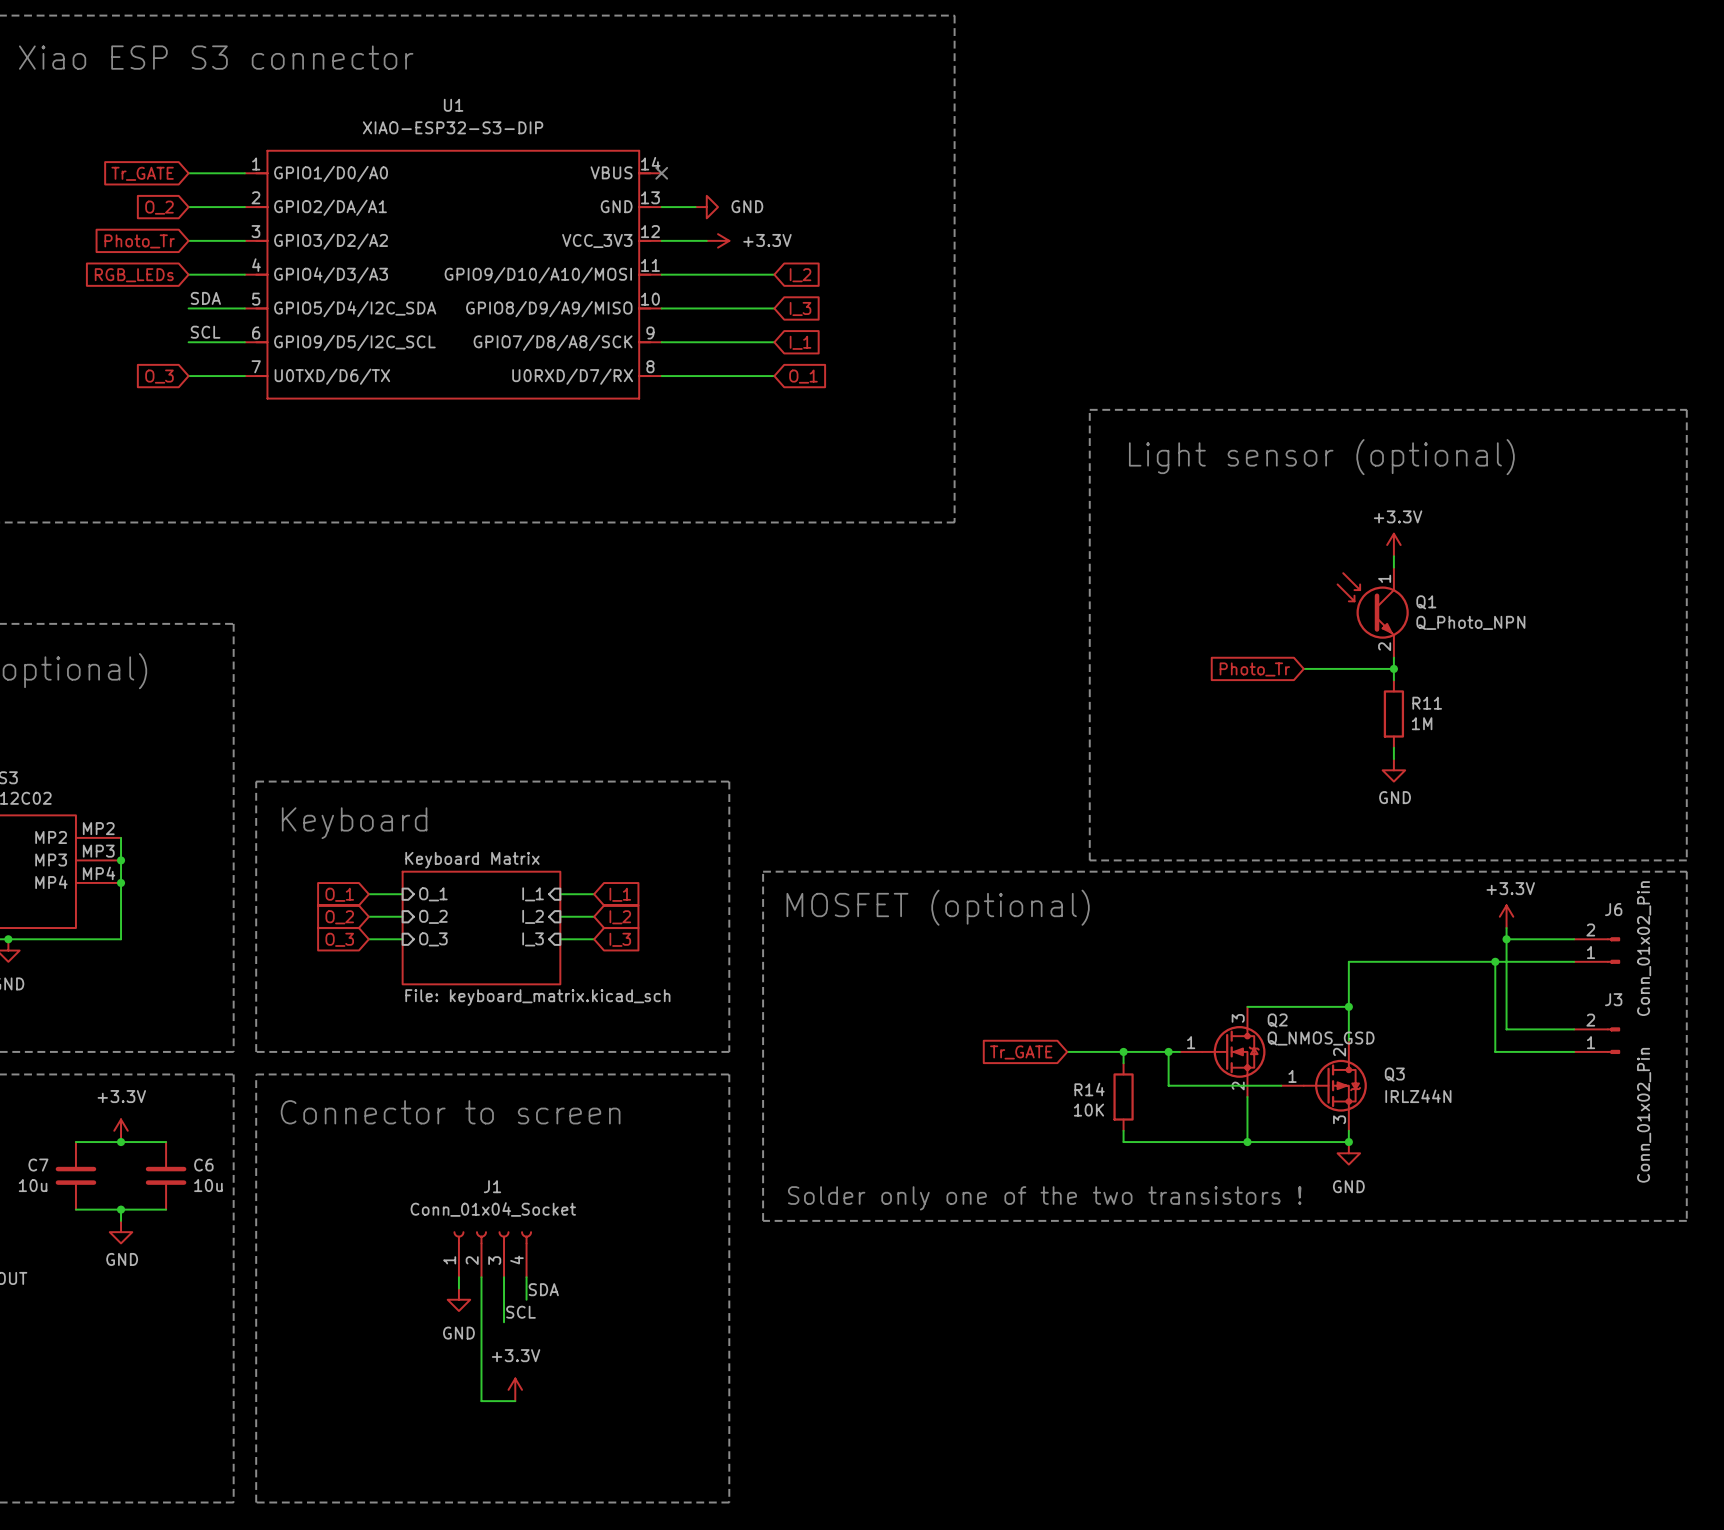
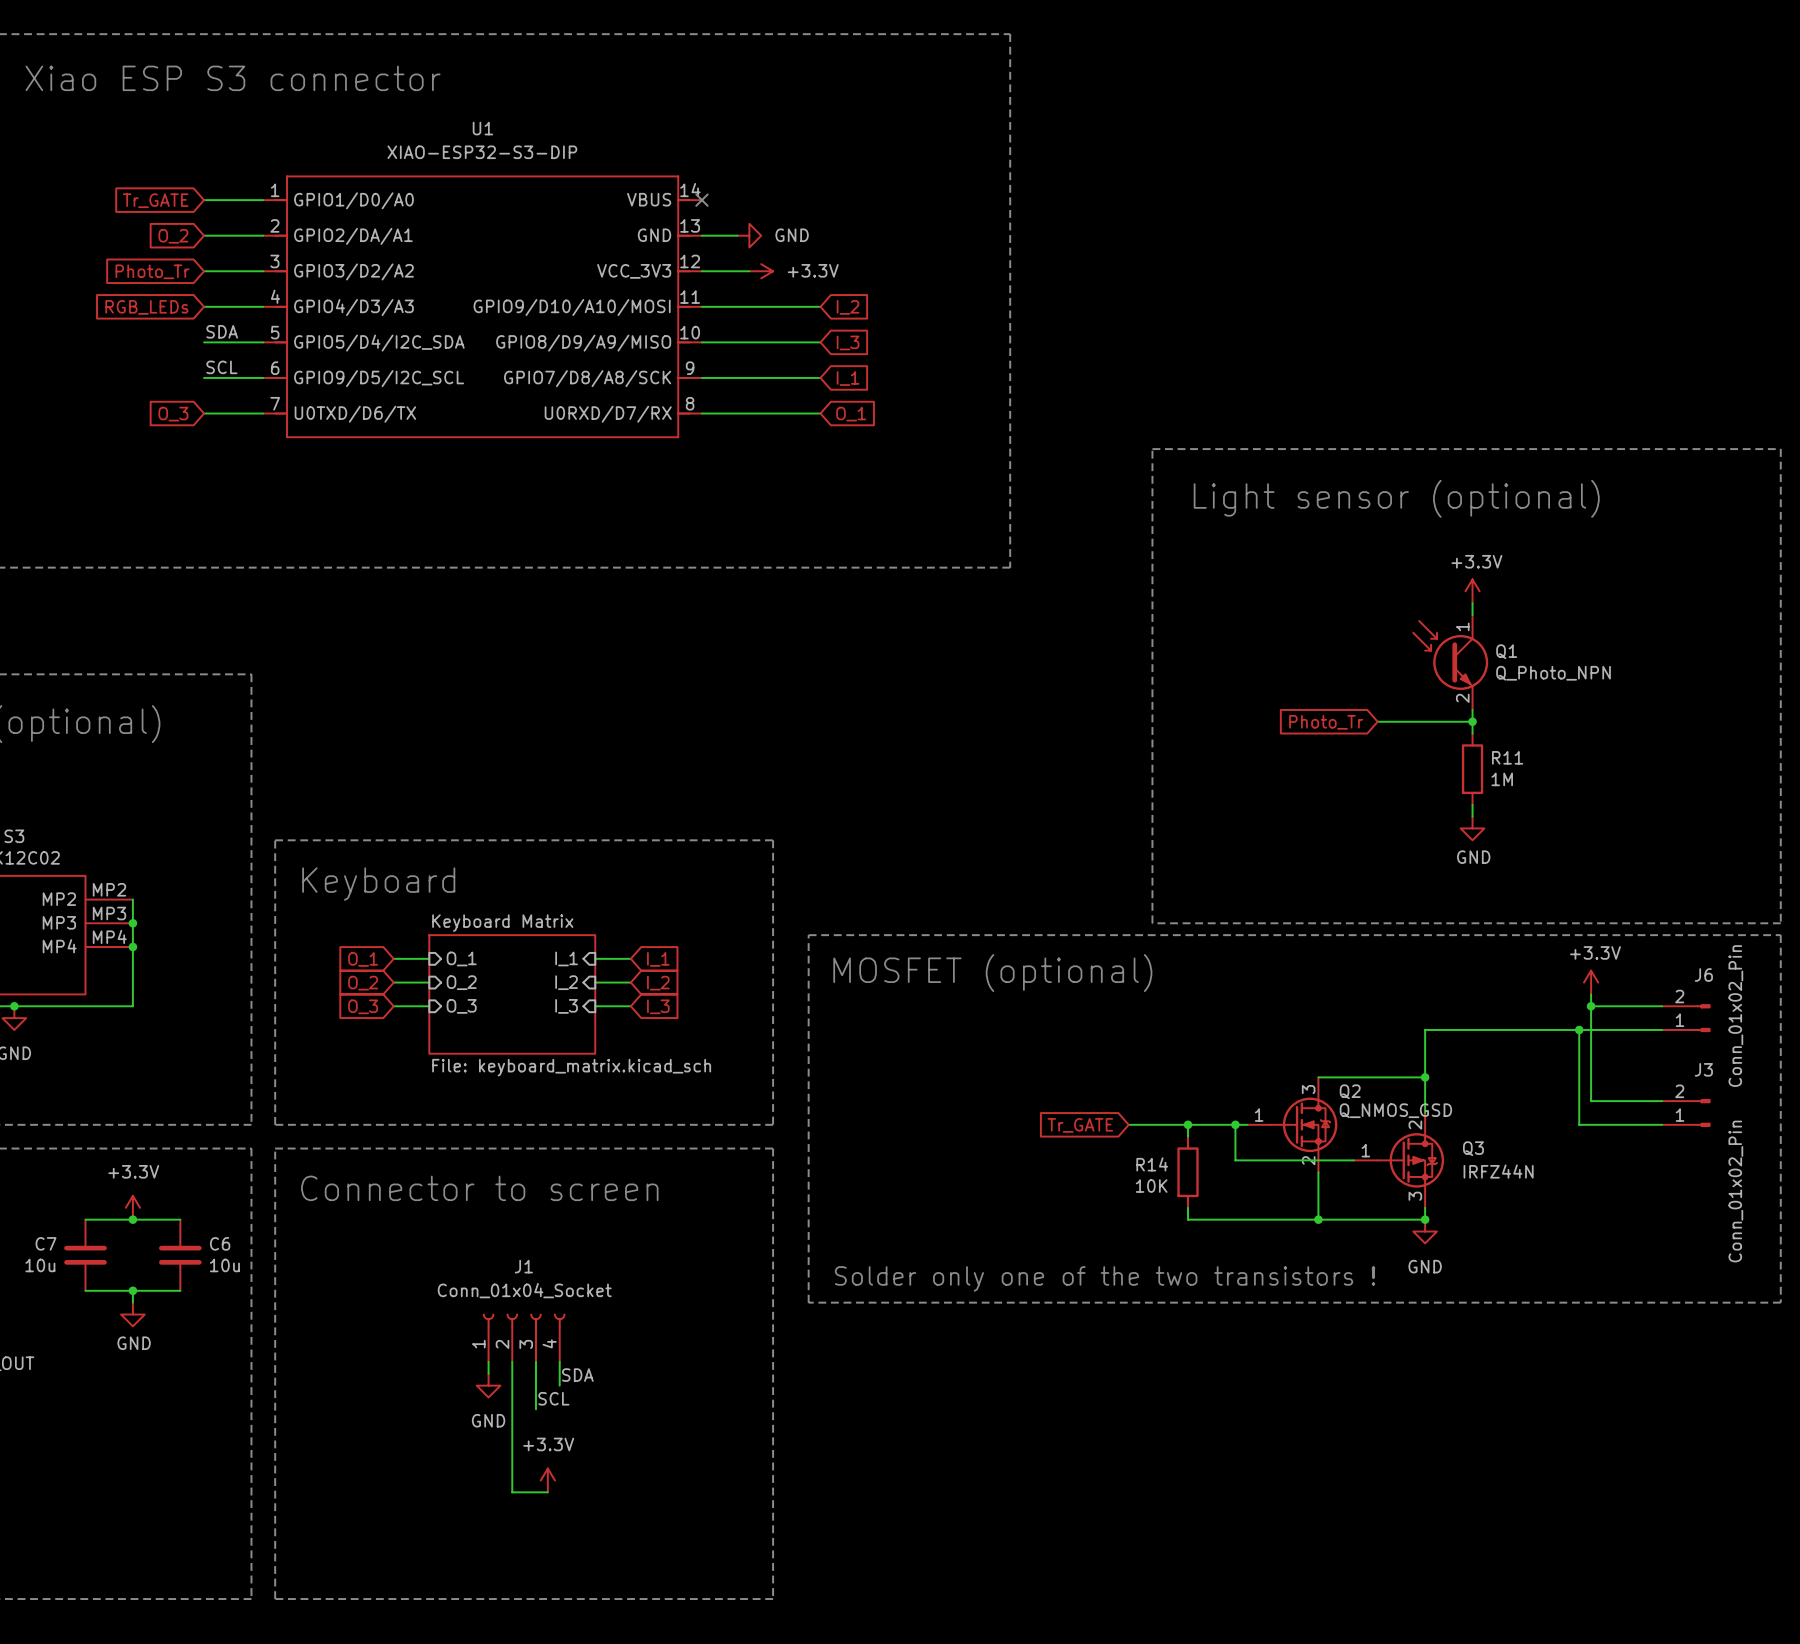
Q3 value: IRLZ44N (1418, 1096) -> IRFZ44N (1498, 1171)

